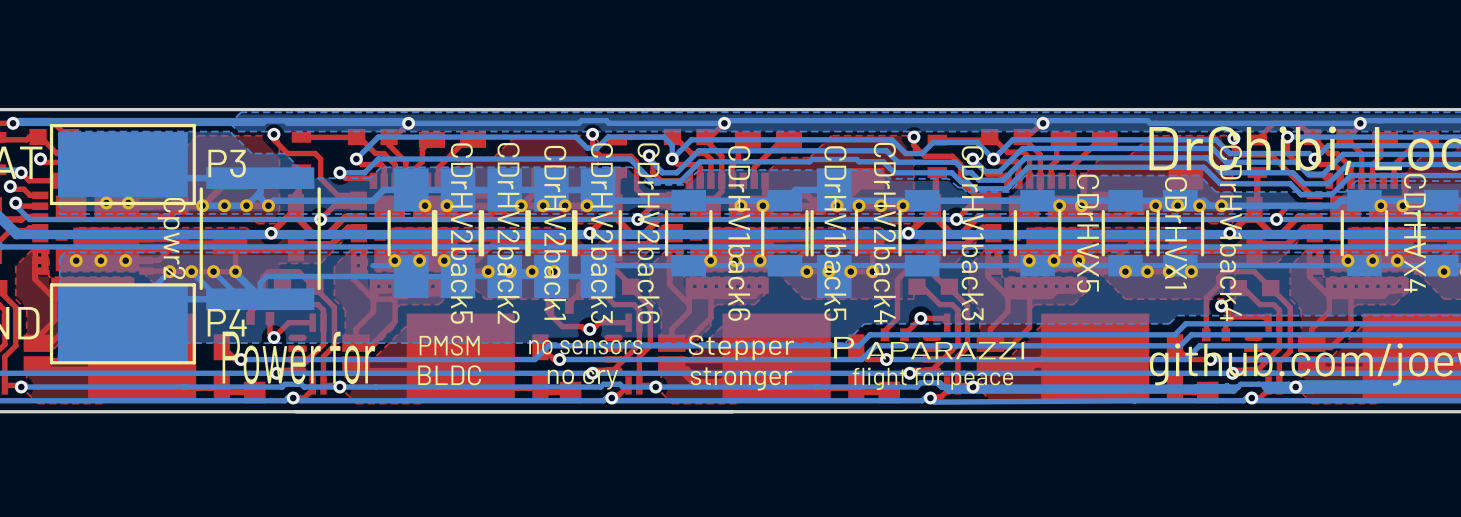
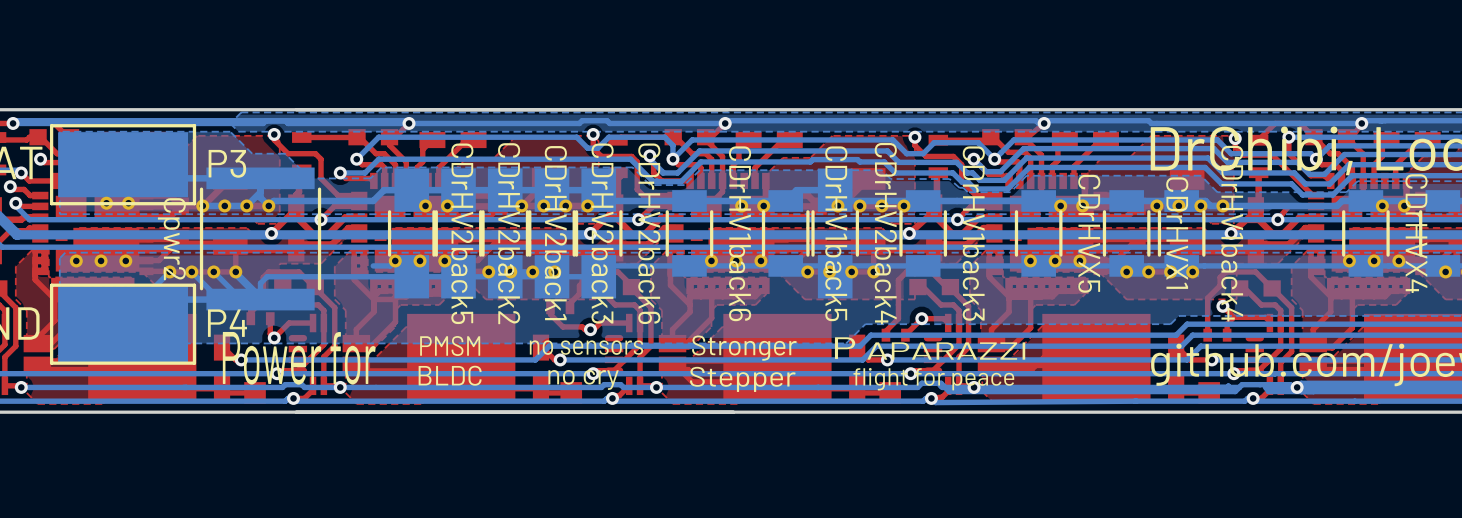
text: Stepper (741, 347) -> Stronger (744, 348)
text: stronger (741, 378) -> Stepper (742, 379)

